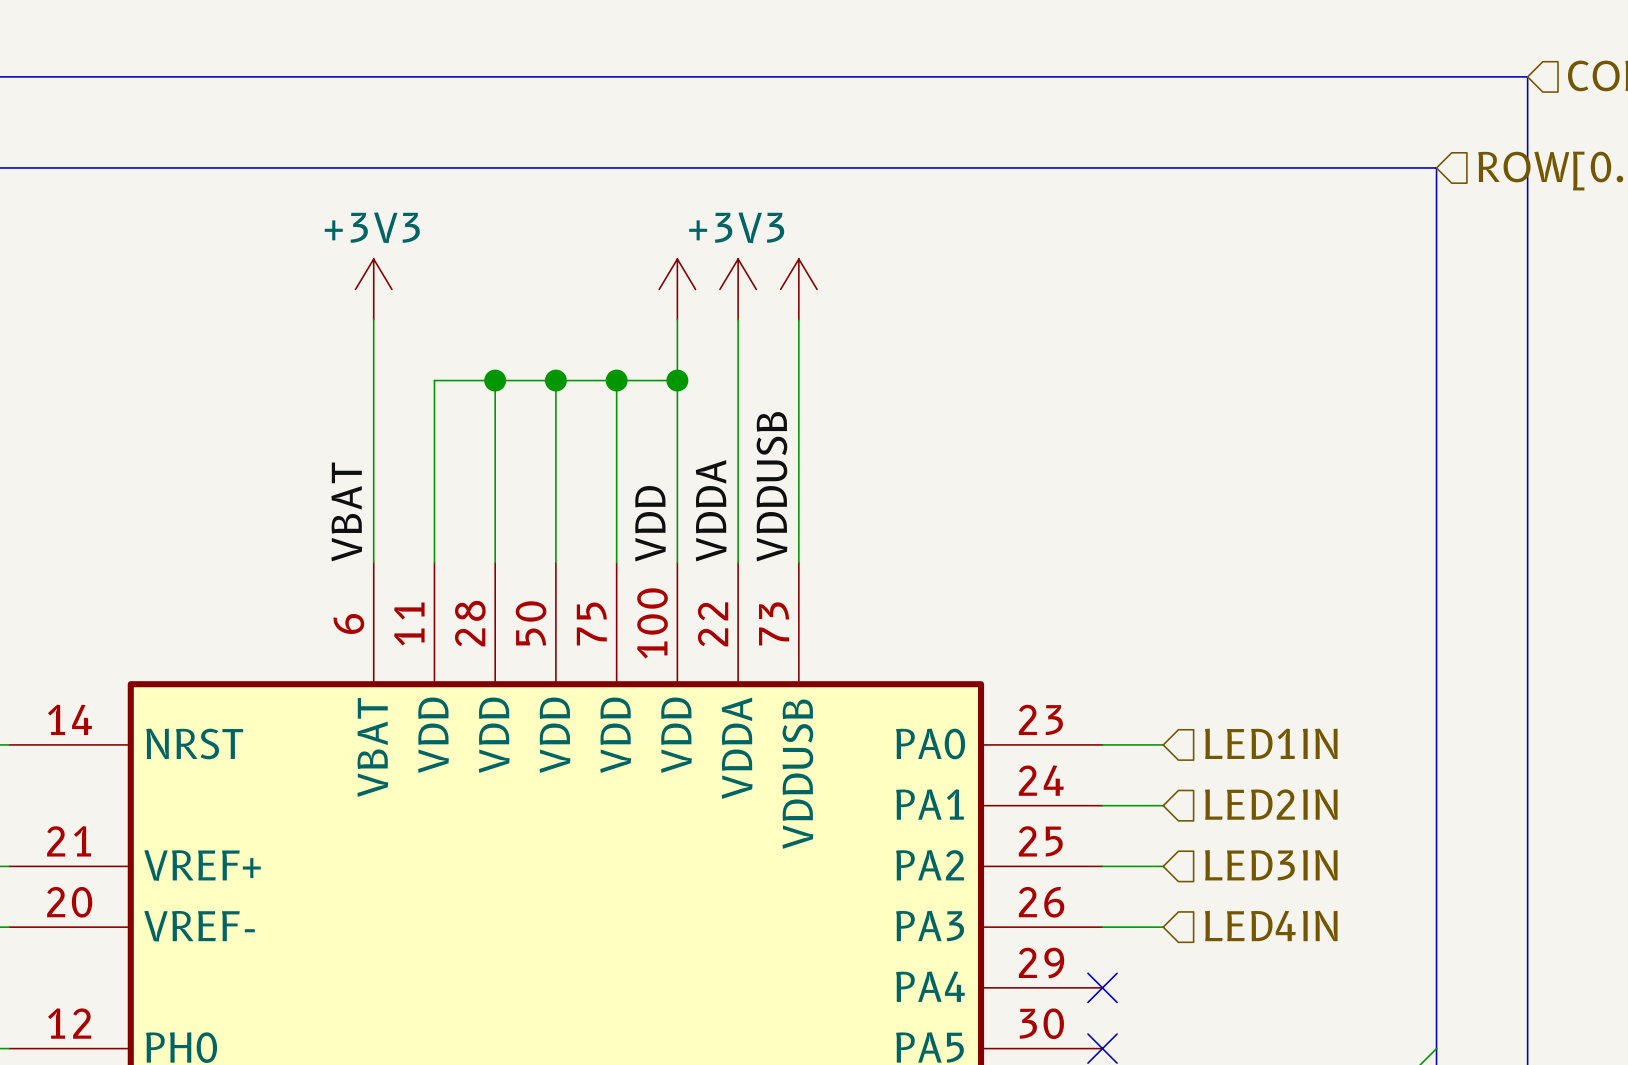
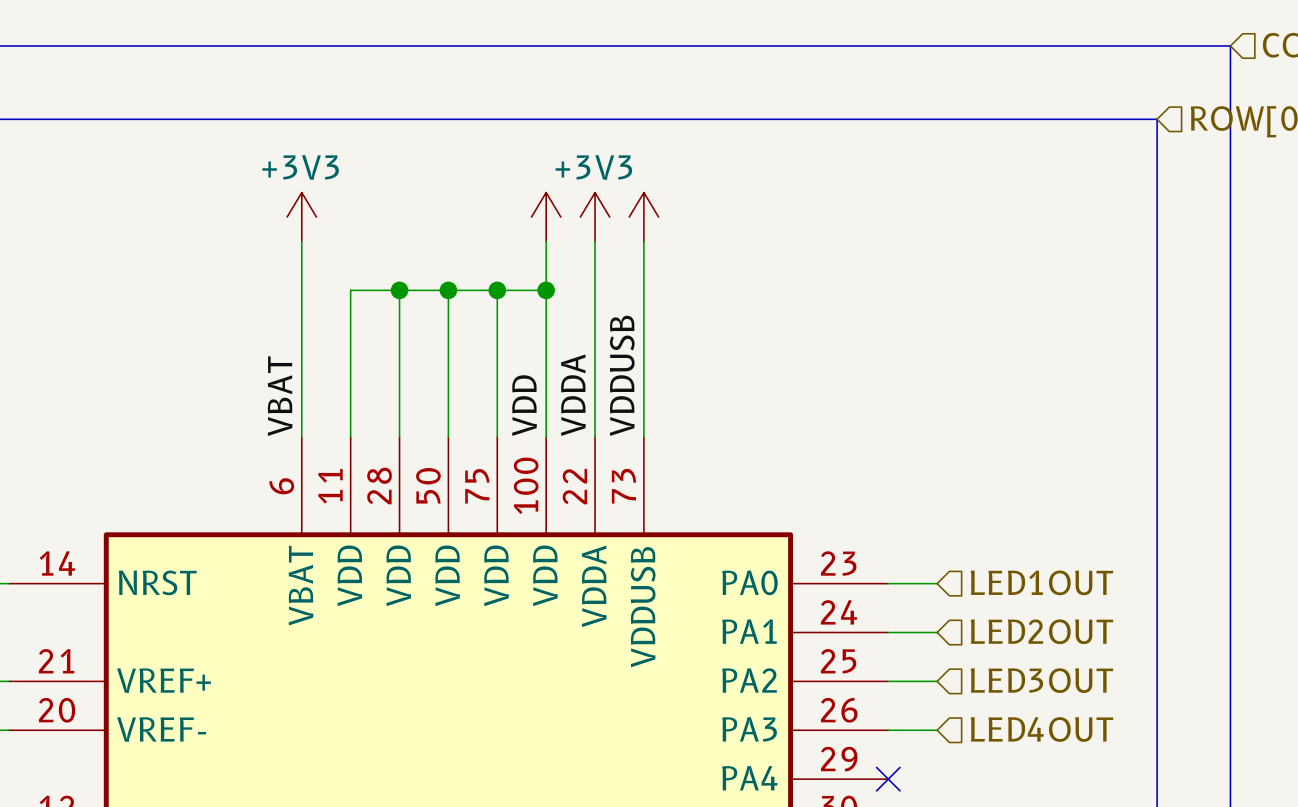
hierarchical label: LED1IN (1271, 743) -> LED1OUT (1041, 582)
hierarchical label: LED2IN (1271, 804) -> LED2OUT (1041, 631)
hierarchical label: LED3IN (1271, 865) -> LED3OUT (1041, 680)
hierarchical label: LED4IN (1271, 926) -> LED4OUT (1041, 729)

